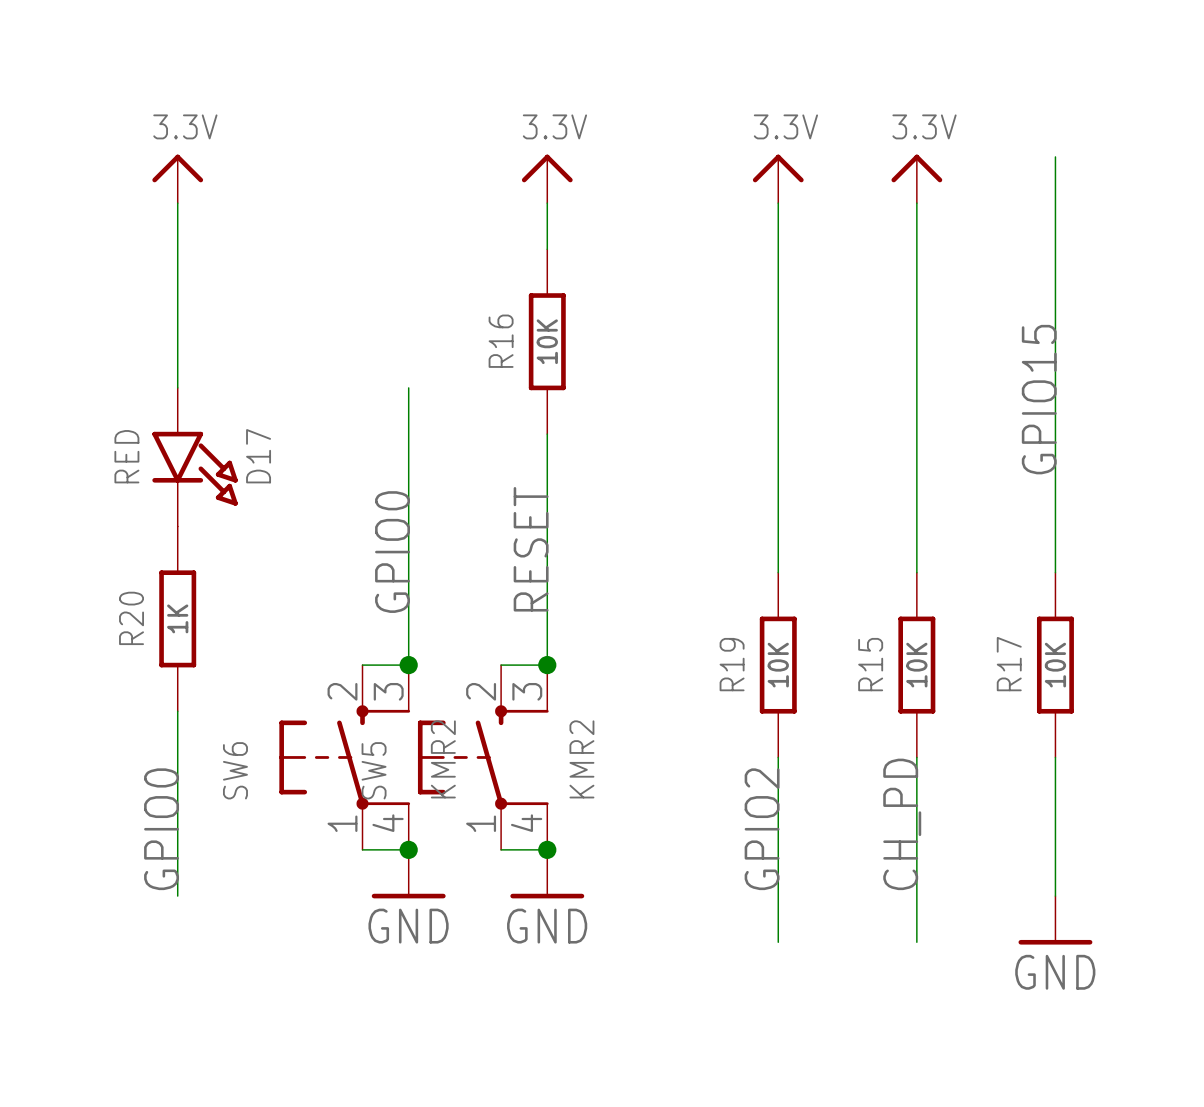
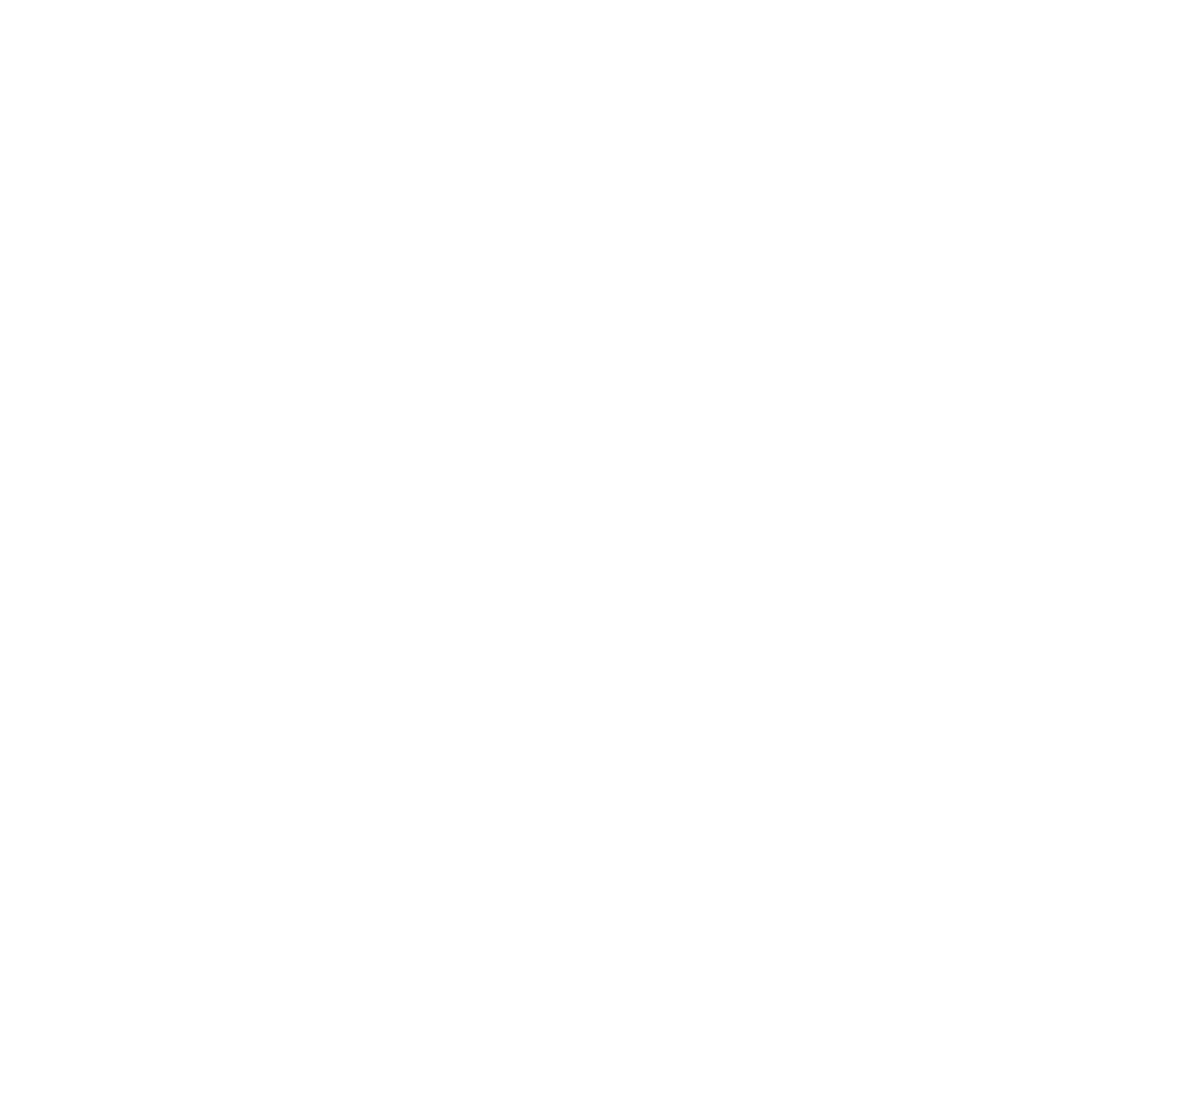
wire: (1055, 156) (1055, 572) -> none
power symbol: 3.3V (177, 178) -> none
power symbol: 3.3V (547, 178) -> none
power symbol: 3.3V (778, 178) -> none
power symbol: 3.3V (916, 178) -> none
wire: (177, 203) (177, 387) -> none
wire: (547, 203) (547, 249) -> none
wire: (778, 203) (778, 572) -> none
wire: (916, 203) (916, 572) -> none
R16: 10K (547, 341) -> none
wire: (408, 387) (408, 665) (362, 665) -> none
label: GPIO15 (1039, 399) -> none
wire: (547, 434) (547, 665) (501, 665) -> none
D17: RED (195, 457) -> none
label: RESET (531, 549) -> none
label: GPIO0 (392, 552) -> none
R20: 1K (177, 618) -> none
junction: (408, 665) -> none
junction: (547, 665) -> none
R19: 10K (778, 665) -> none
R15: 10K (916, 665) -> none
R17: 10K (1055, 665) -> none
wire: (177, 711) (177, 896) -> none
SW6: KMR2 (344, 757) -> none
SW5: KMR2 (483, 757) -> none
wire: (778, 757) (778, 942) -> none
wire: (916, 757) (916, 942) -> none
wire: (1055, 757) (1055, 896) -> none
label: CH_PD (902, 824) -> none
label: GPIO0 (161, 829) -> none
label: GPIO2 (762, 829) -> none
wire: (362, 849) (408, 849) -> none
junction: (408, 849) -> none
wire: (501, 849) (547, 849) -> none
junction: (547, 849) -> none
power symbol: GND (408, 874) -> none
power symbol: GND (547, 874) -> none
power symbol: GND (1055, 920) -> none

